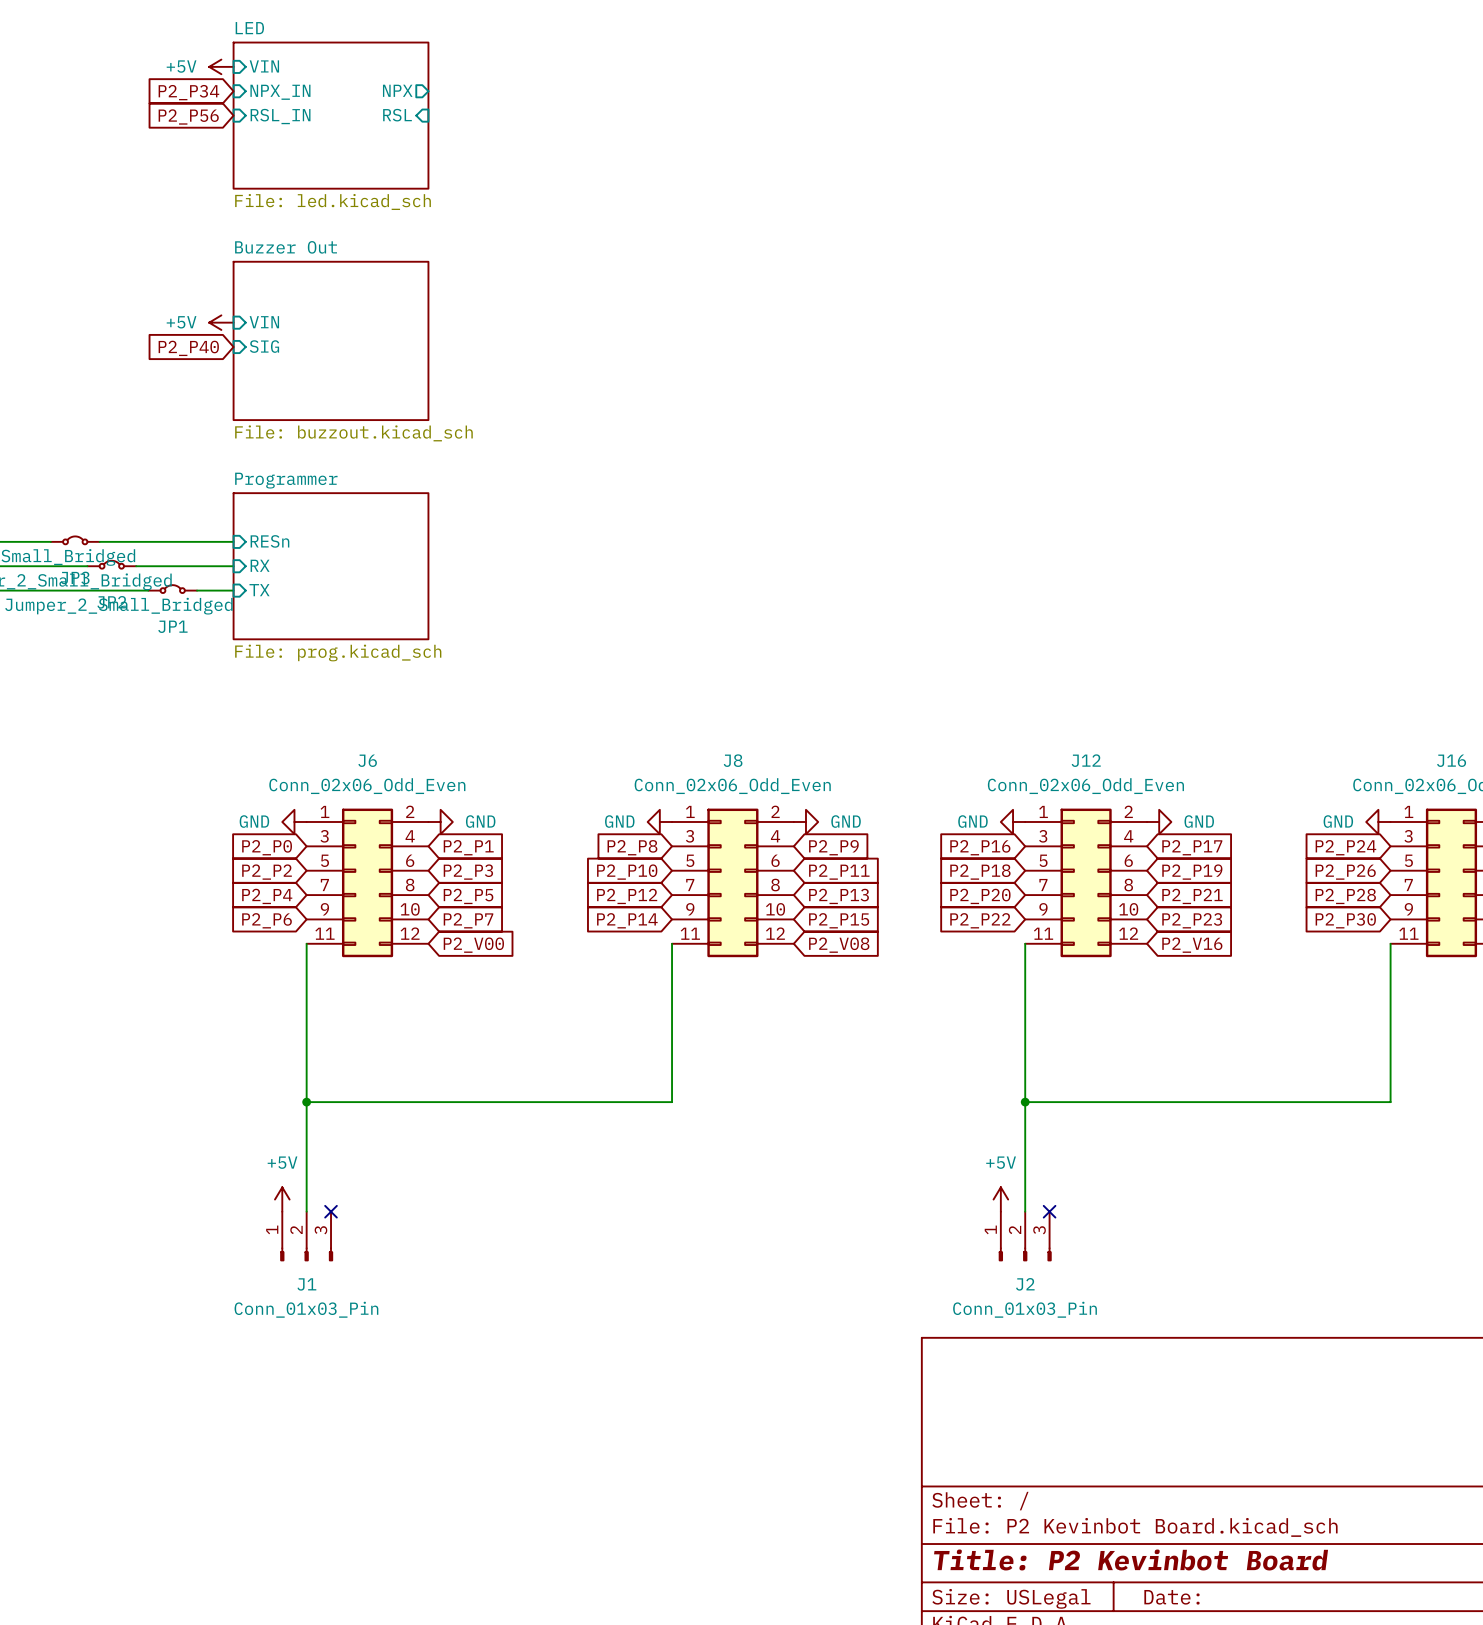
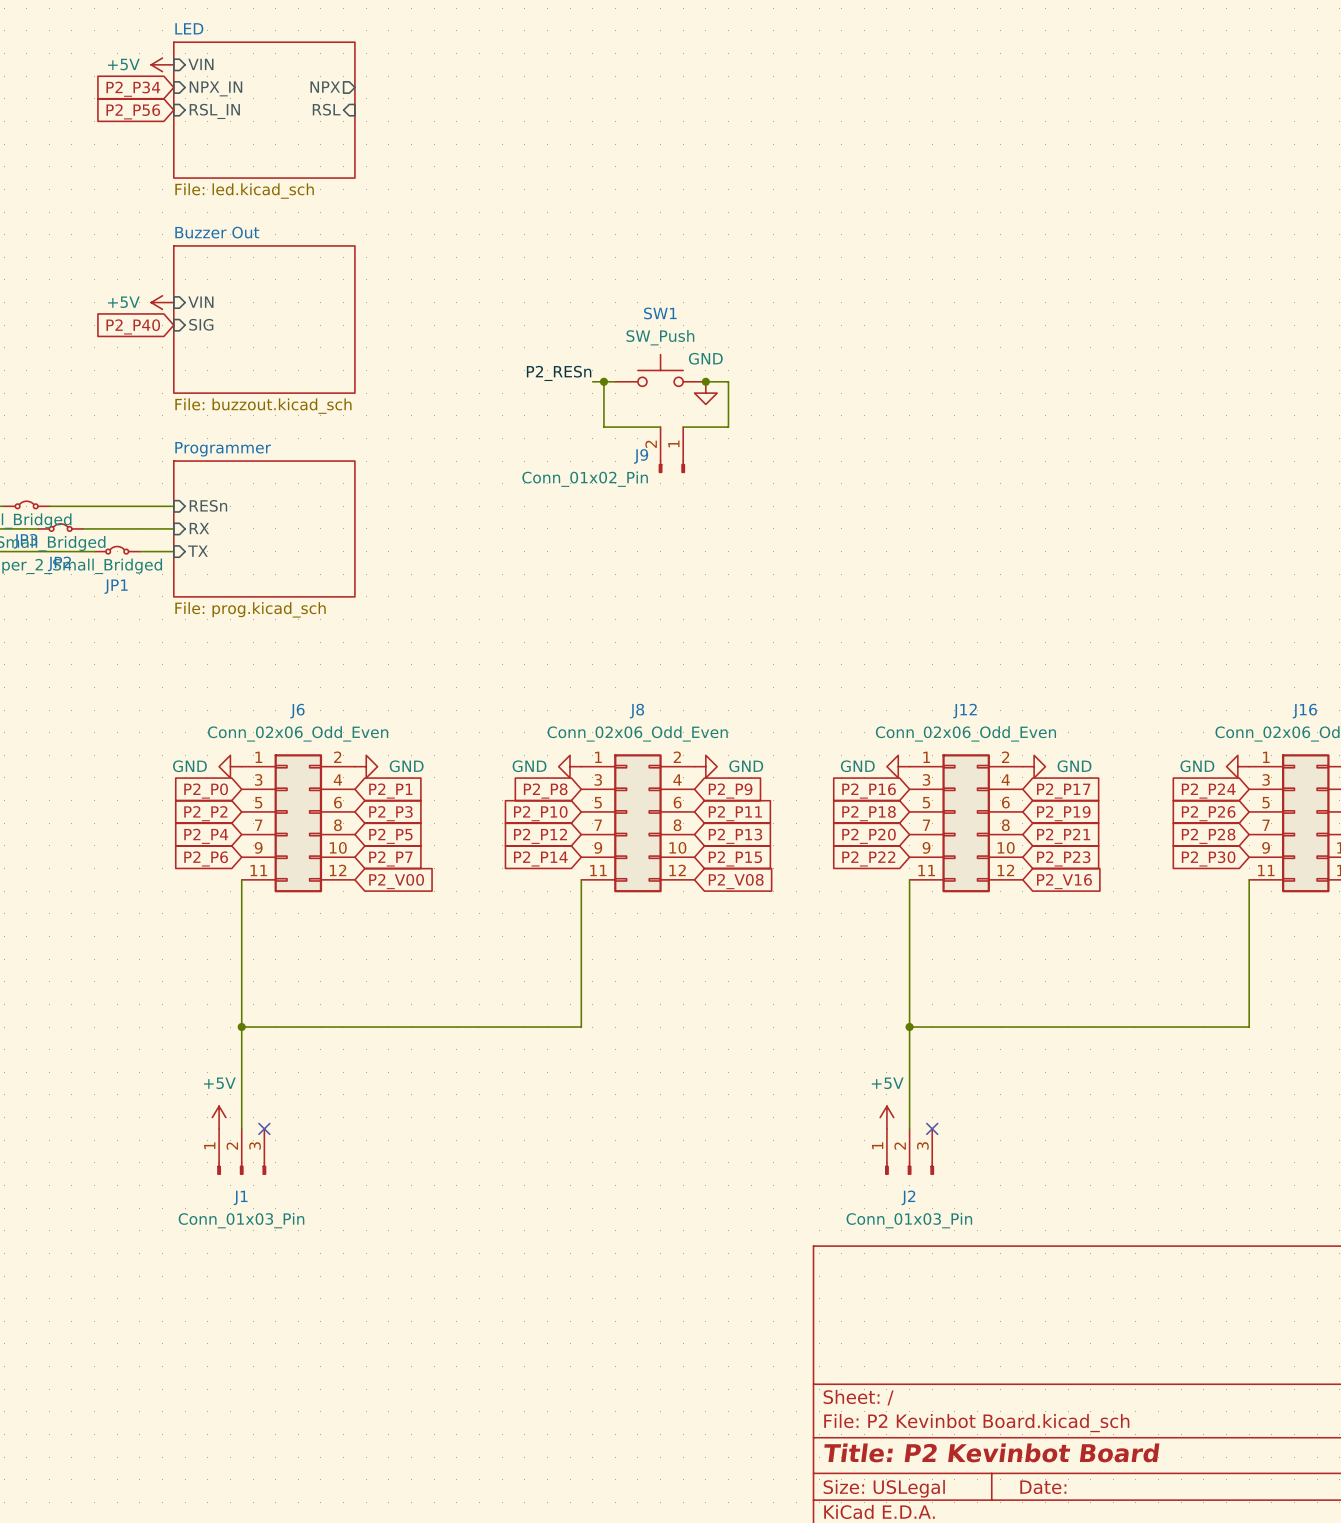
SW1: none -> SW_Push (660, 370)
label: none -> P2_RESn (559, 373)
wire: none -> (592, 381) (615, 381)
wire: none -> (603, 381) (603, 427) (660, 427)
junction: none -> (603, 381)
wire: none -> (705, 381) (728, 381) (728, 427) (683, 427)
junction: none -> (705, 381)
power symbol: none -> GND (705, 393)
J9: none -> Conn_01x02_Pin (671, 450)

